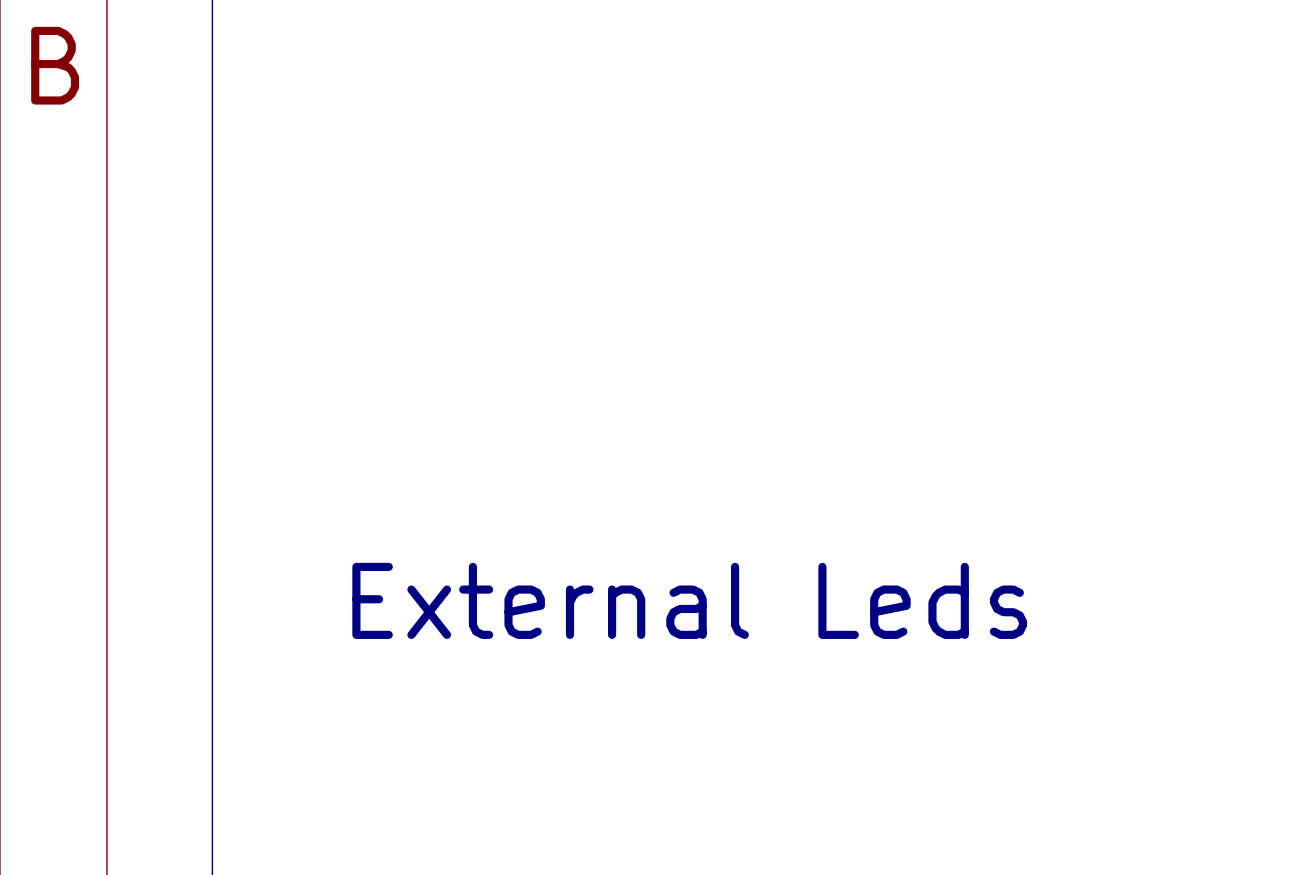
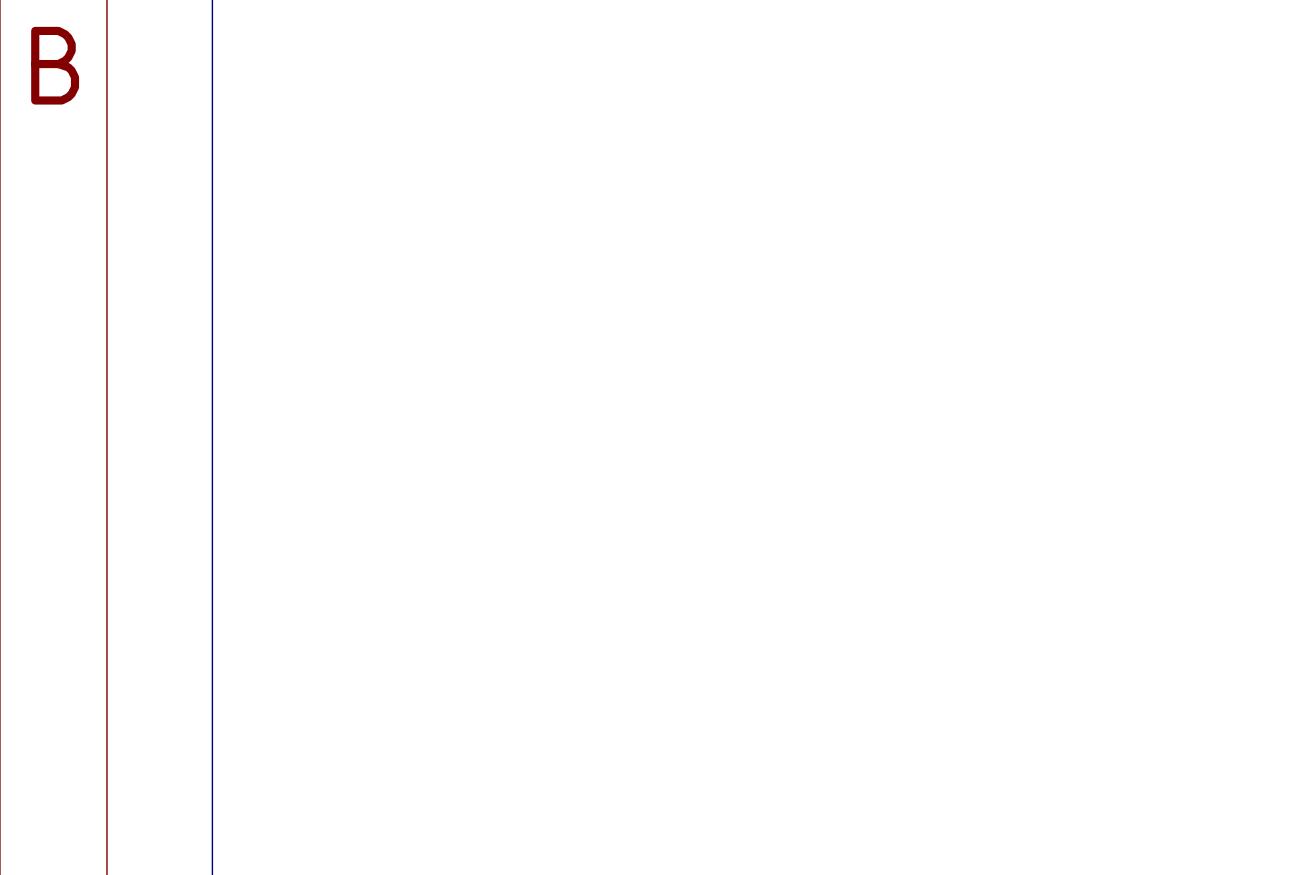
text: External Leds (689, 600) -> none

